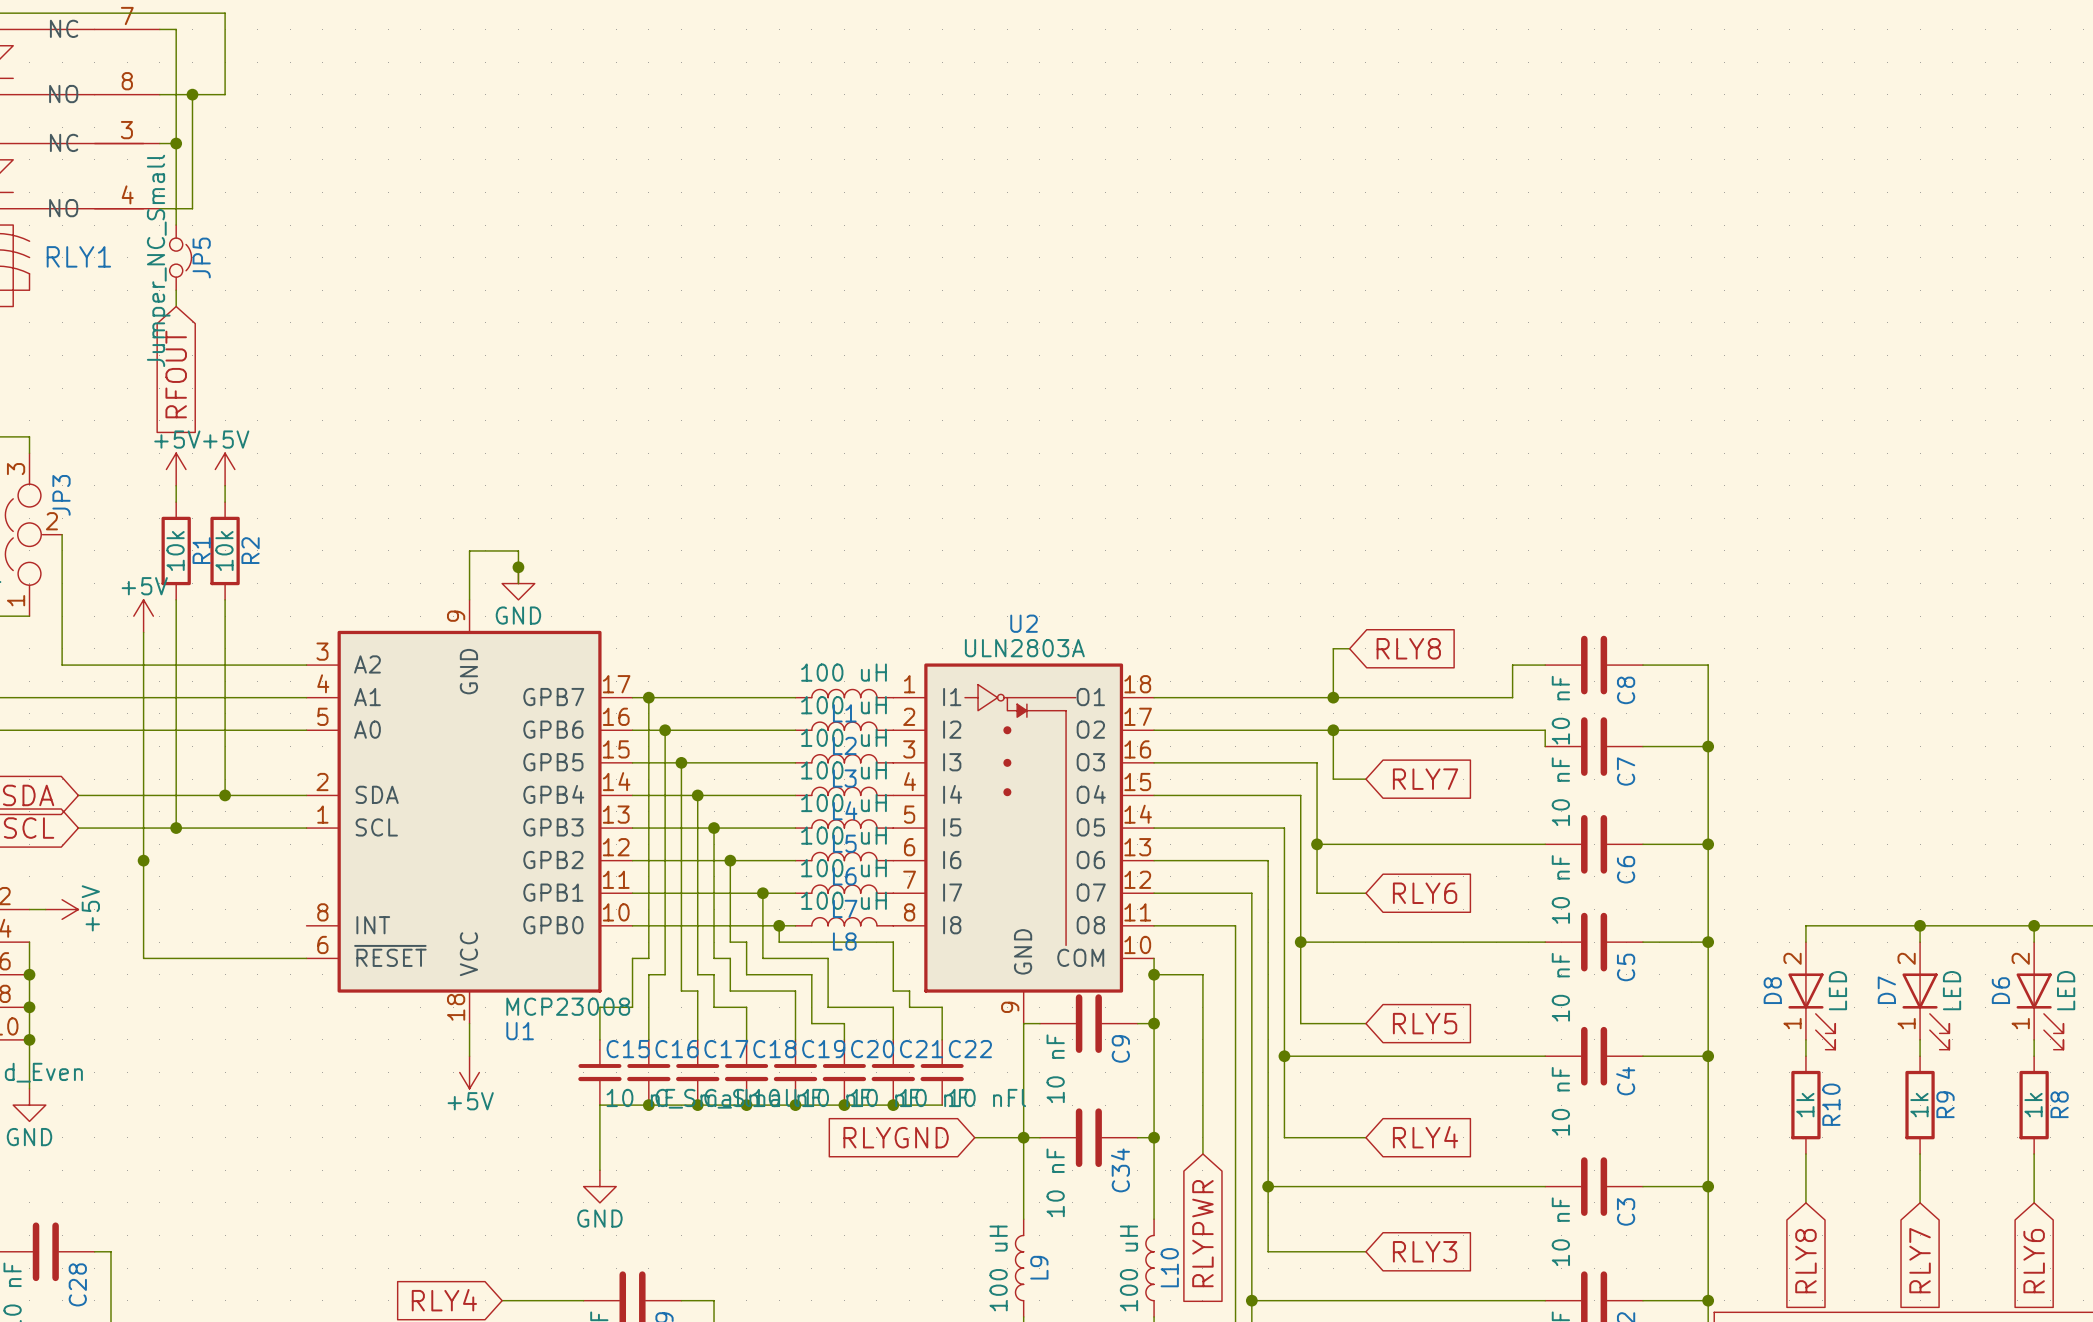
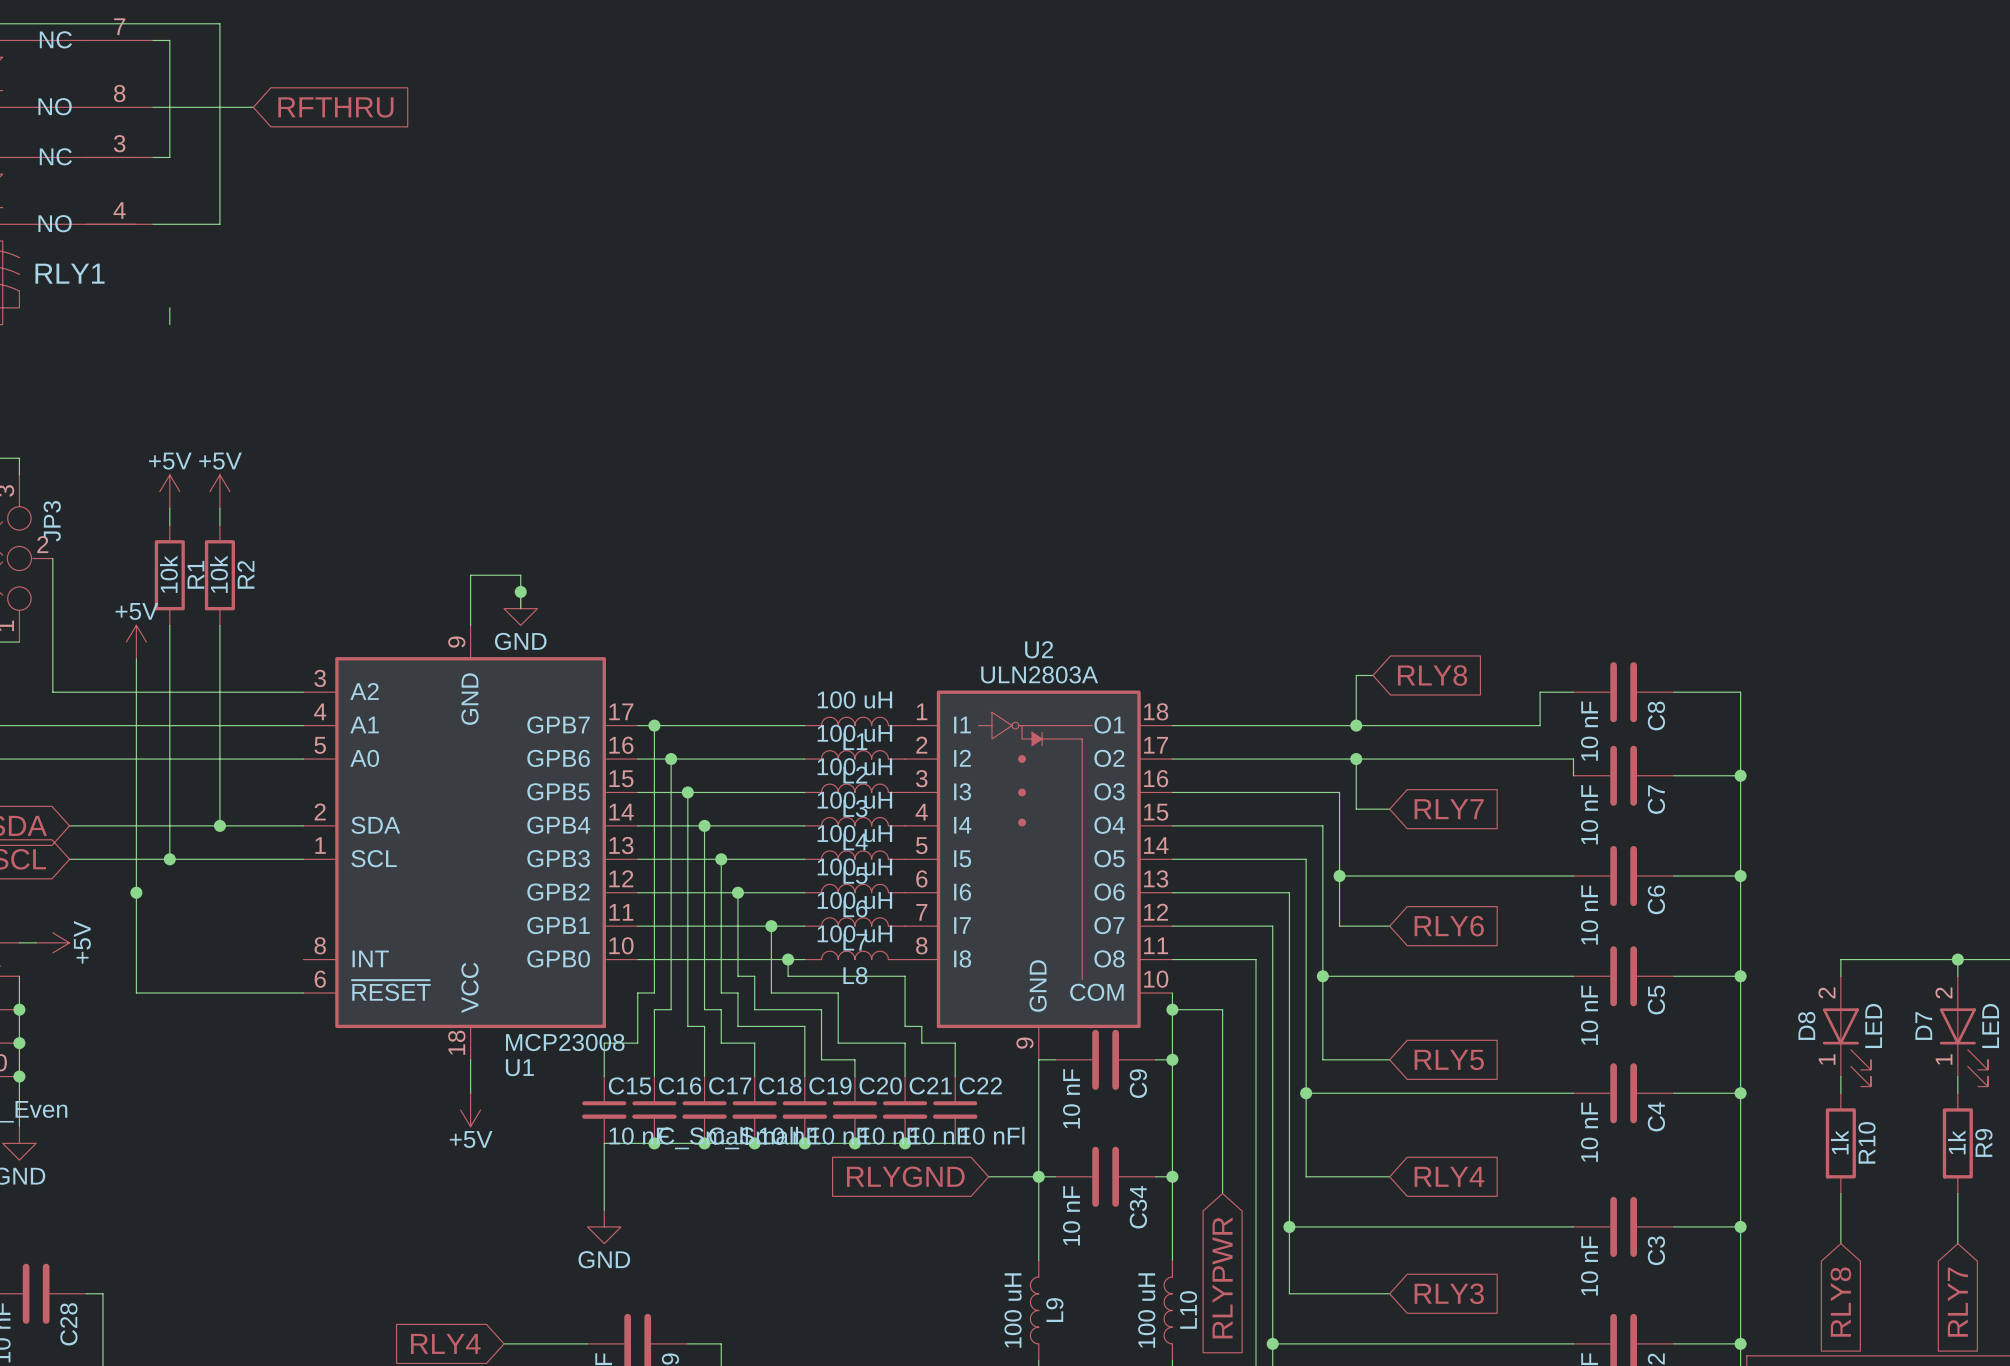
wire: (192, 94) (192, 208) -> (253, 107) (219, 107) (219, 224) (186, 224)
junction: (192, 94) -> none
global label: none -> RFTHRU (335, 107)
wire: (176, 143) (176, 225) -> none
junction: (176, 143) -> none
JP5: Jumper_NC_Small (180, 257) -> none
global label: RFOUT (176, 374) -> none

